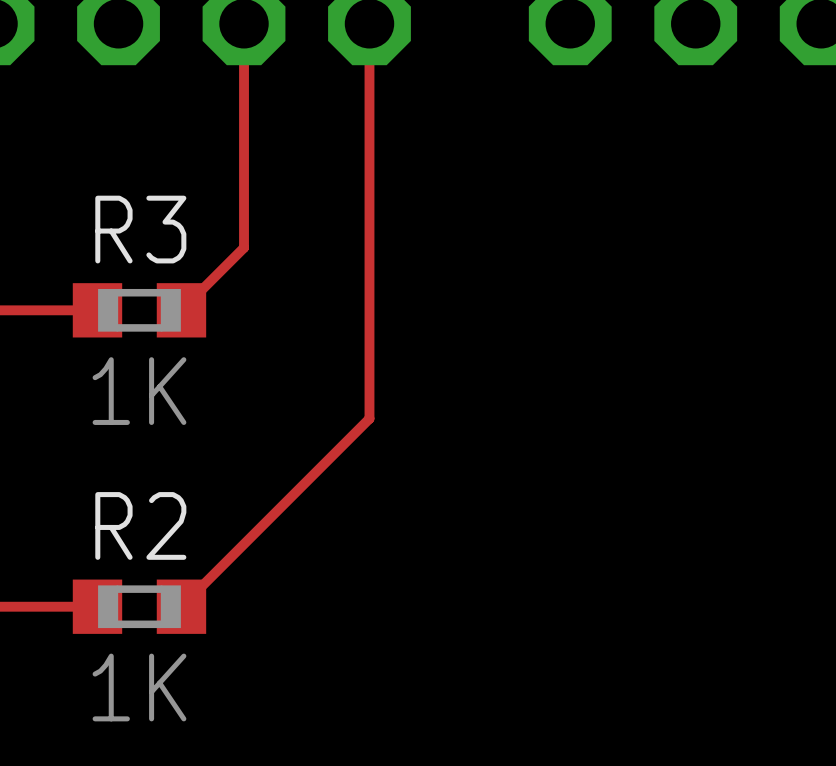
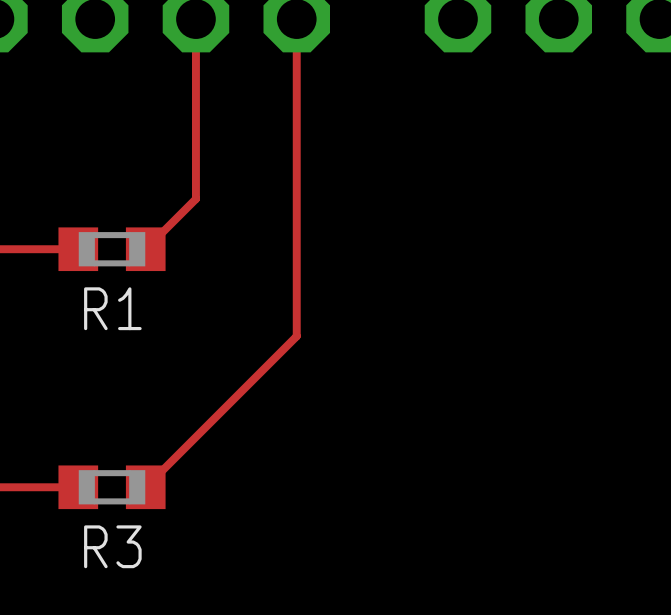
R3 name: R3 (140, 229) -> R1 (112, 308)
R3 value: 1K (139, 391) -> none
R2 name: R2 (140, 525) -> R3 (112, 546)
R2 value: 1K (139, 687) -> none

